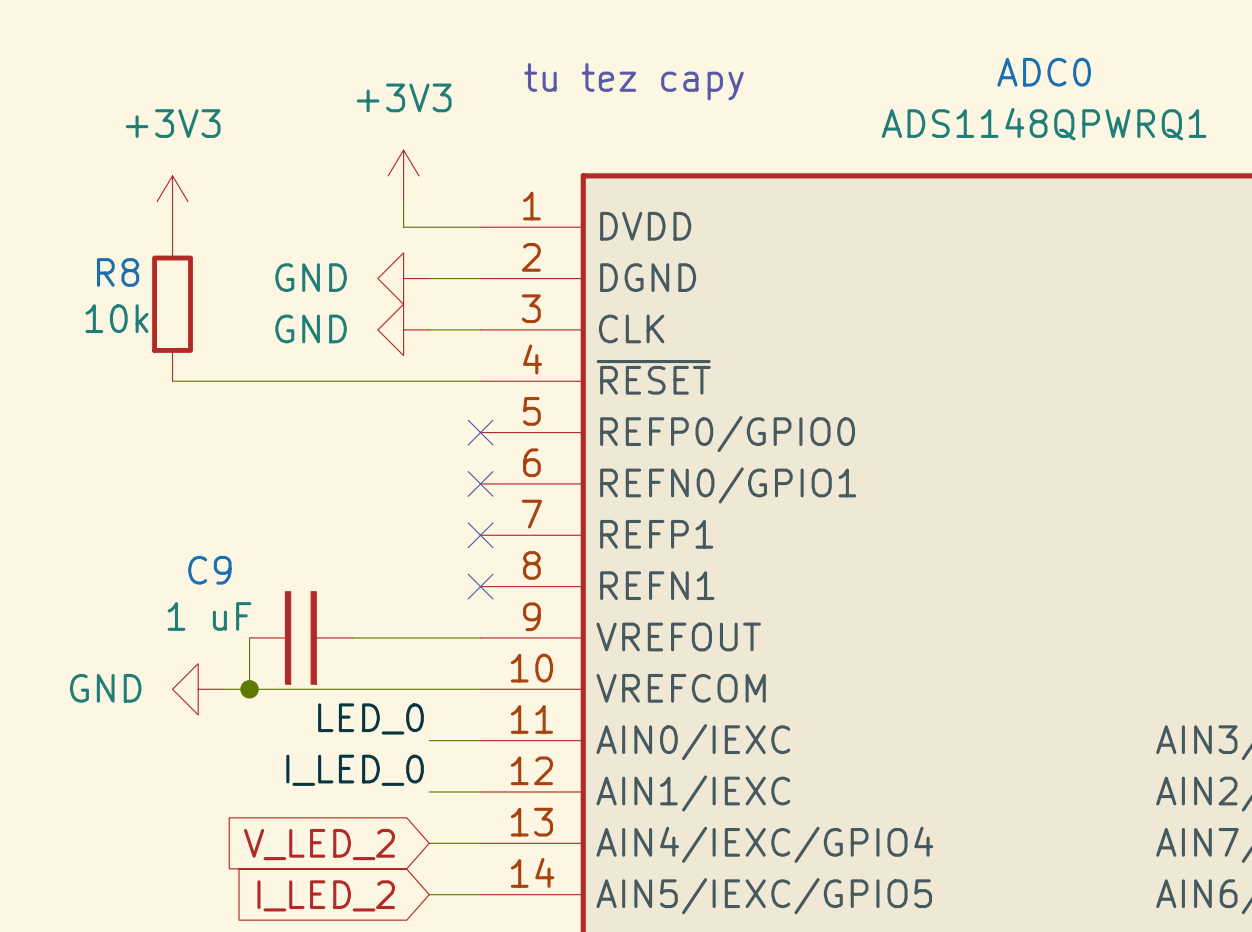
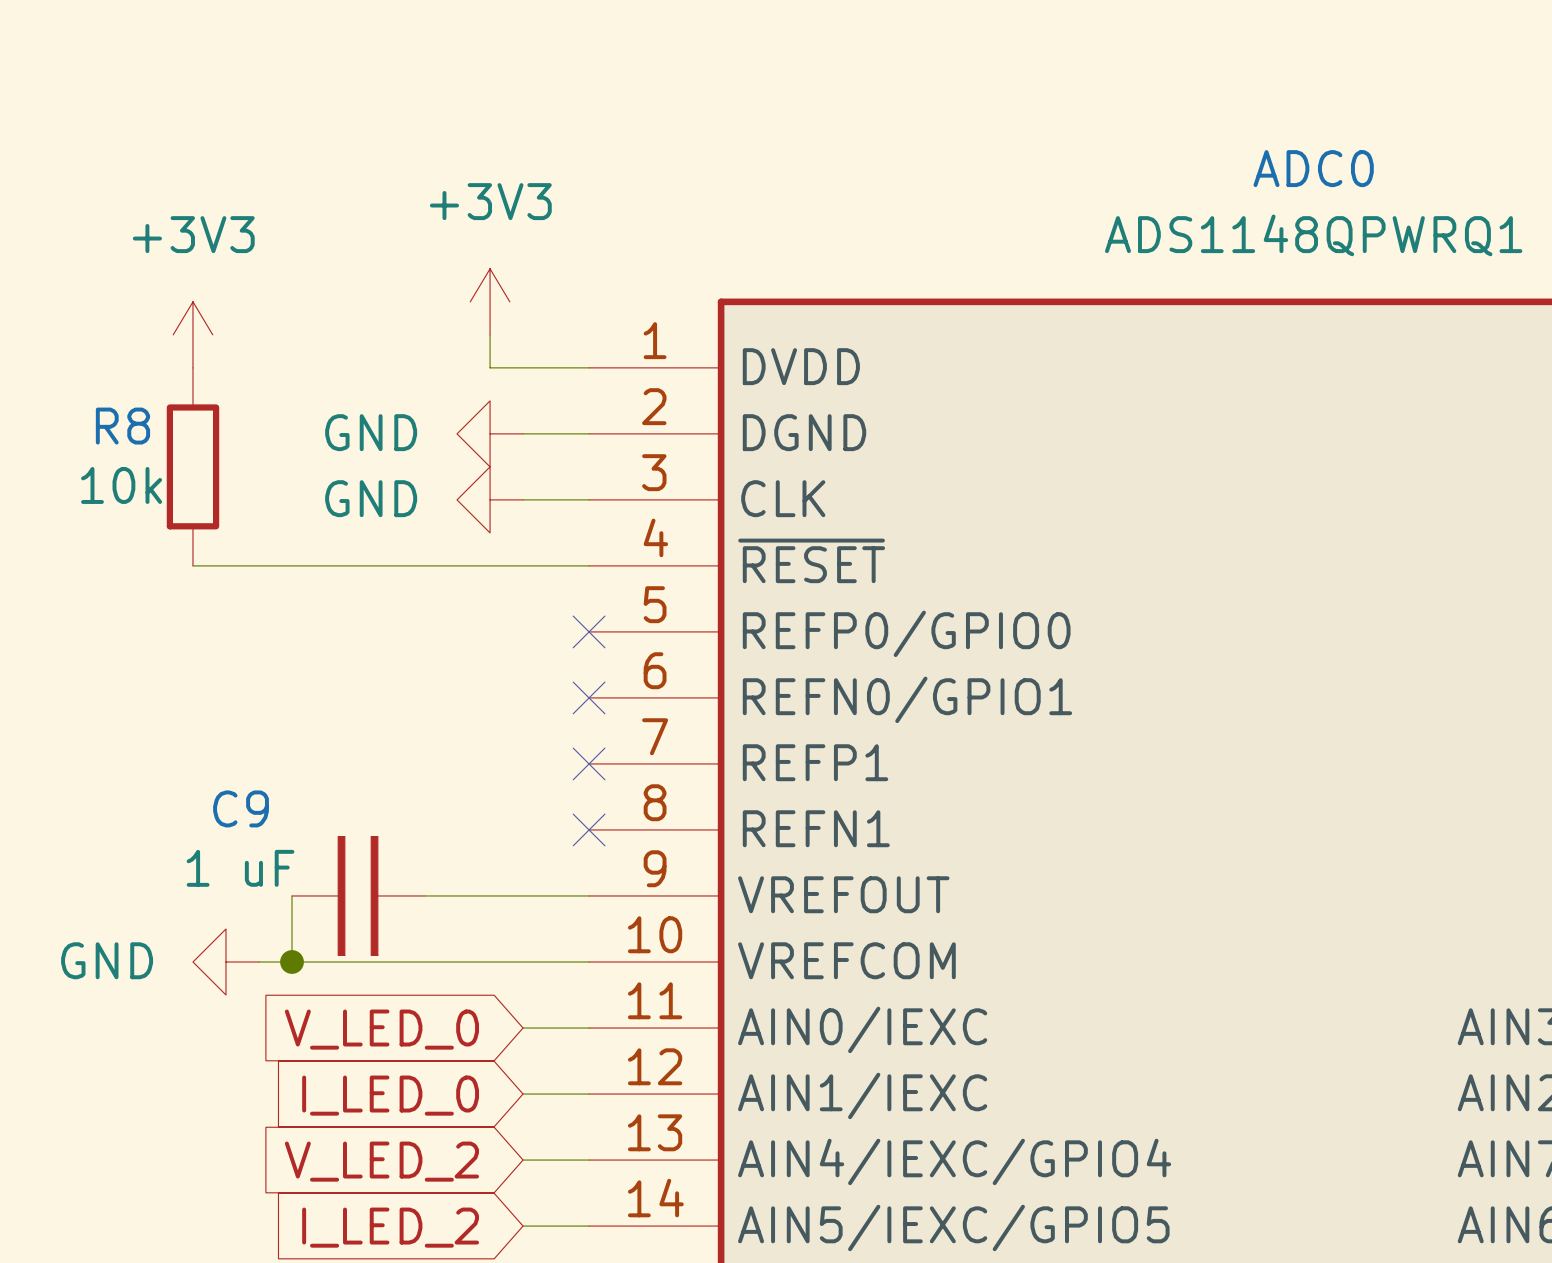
text: tu tez capy (633, 81) -> none
label: LED_0 (370, 718) -> none
global label: none -> V_LED_0 (381, 1029)
label: I_LED_0 (355, 770) -> none
global label: none -> I_LED_0 (390, 1095)

